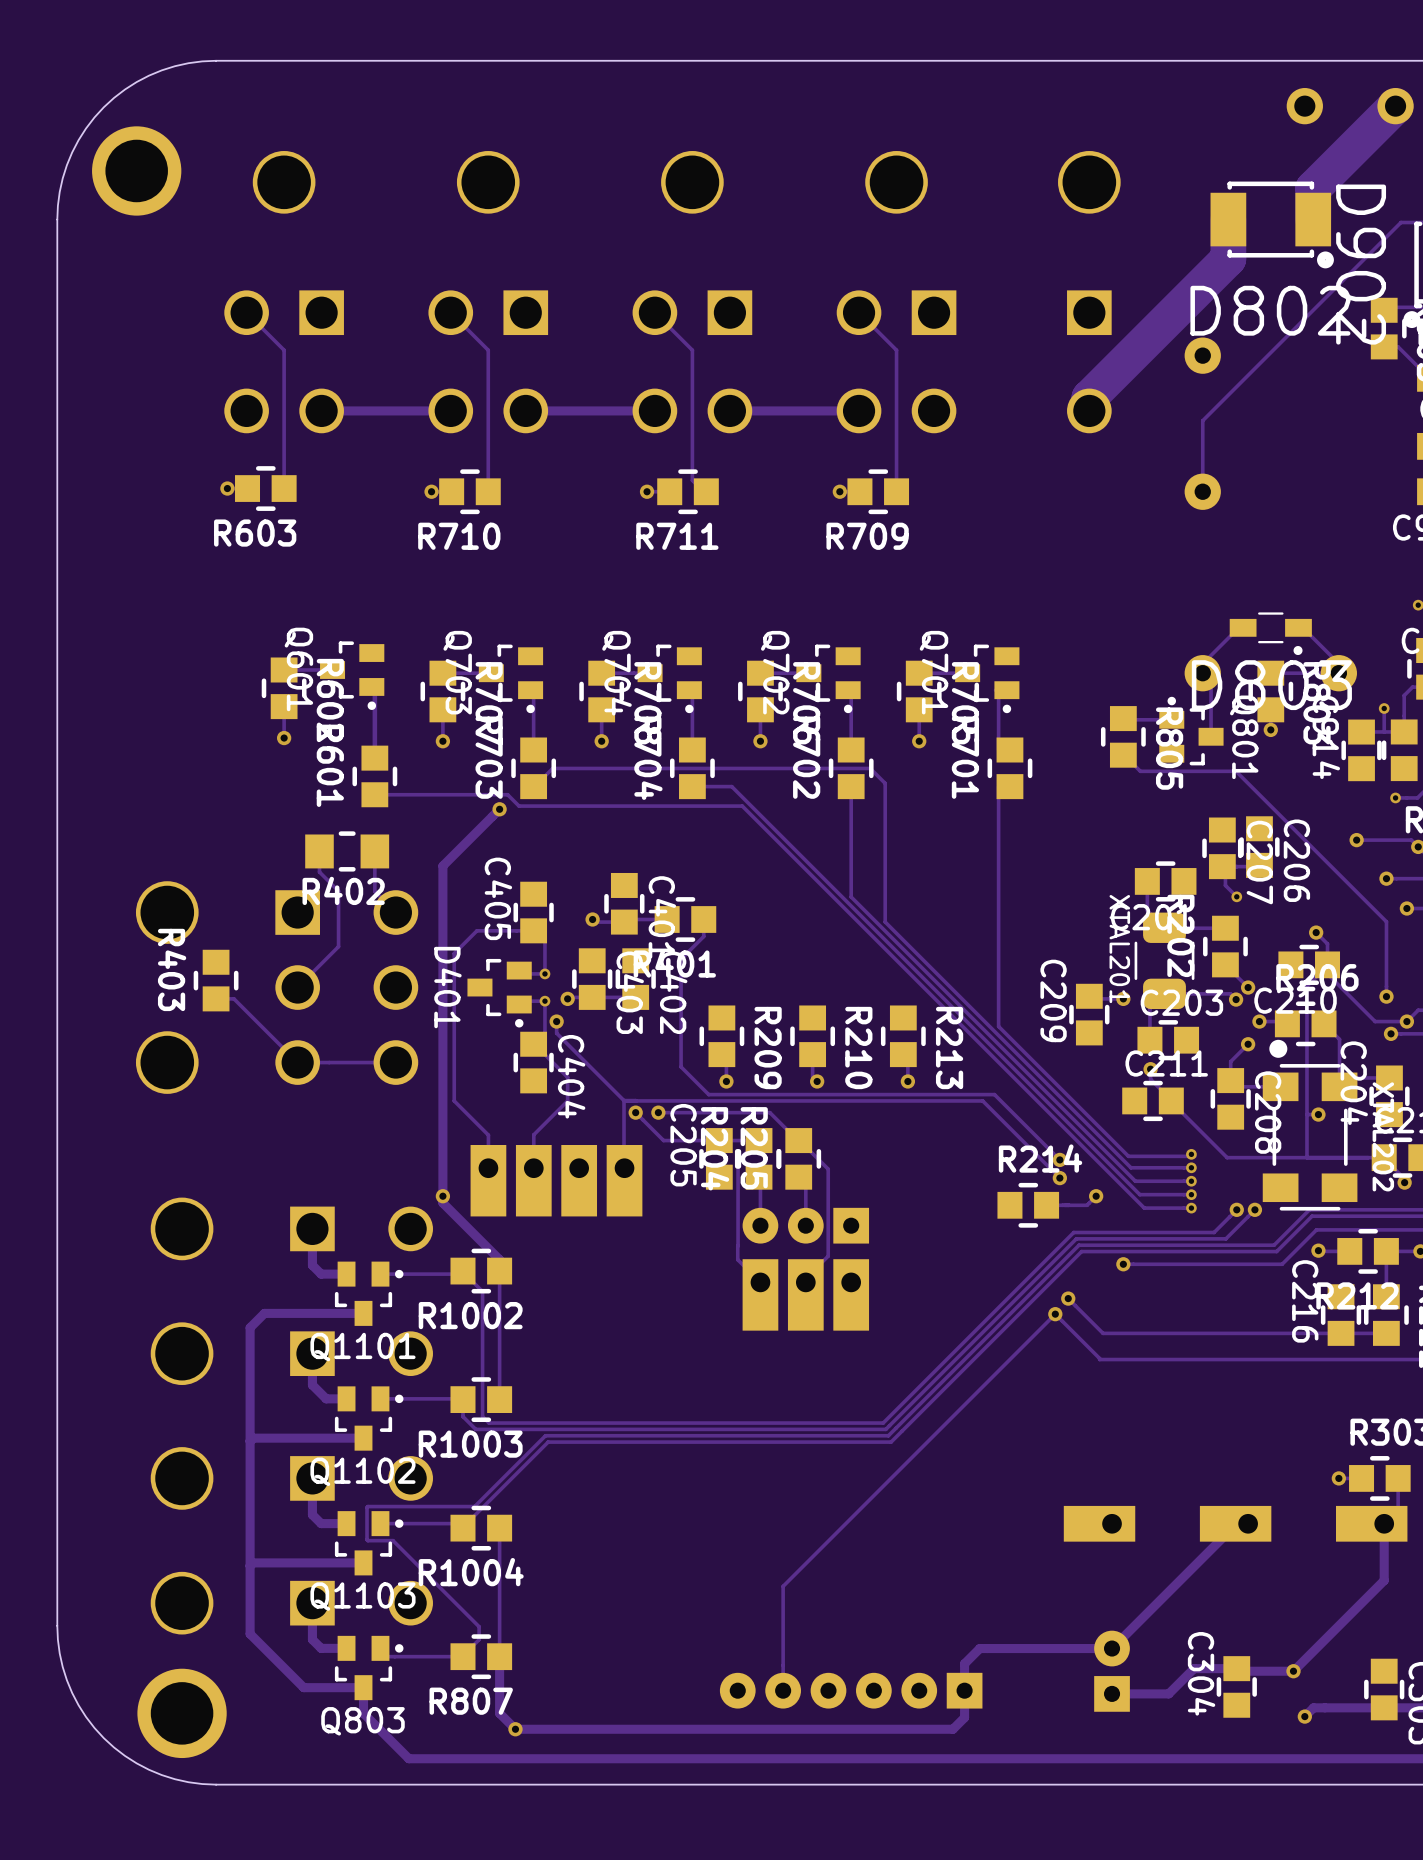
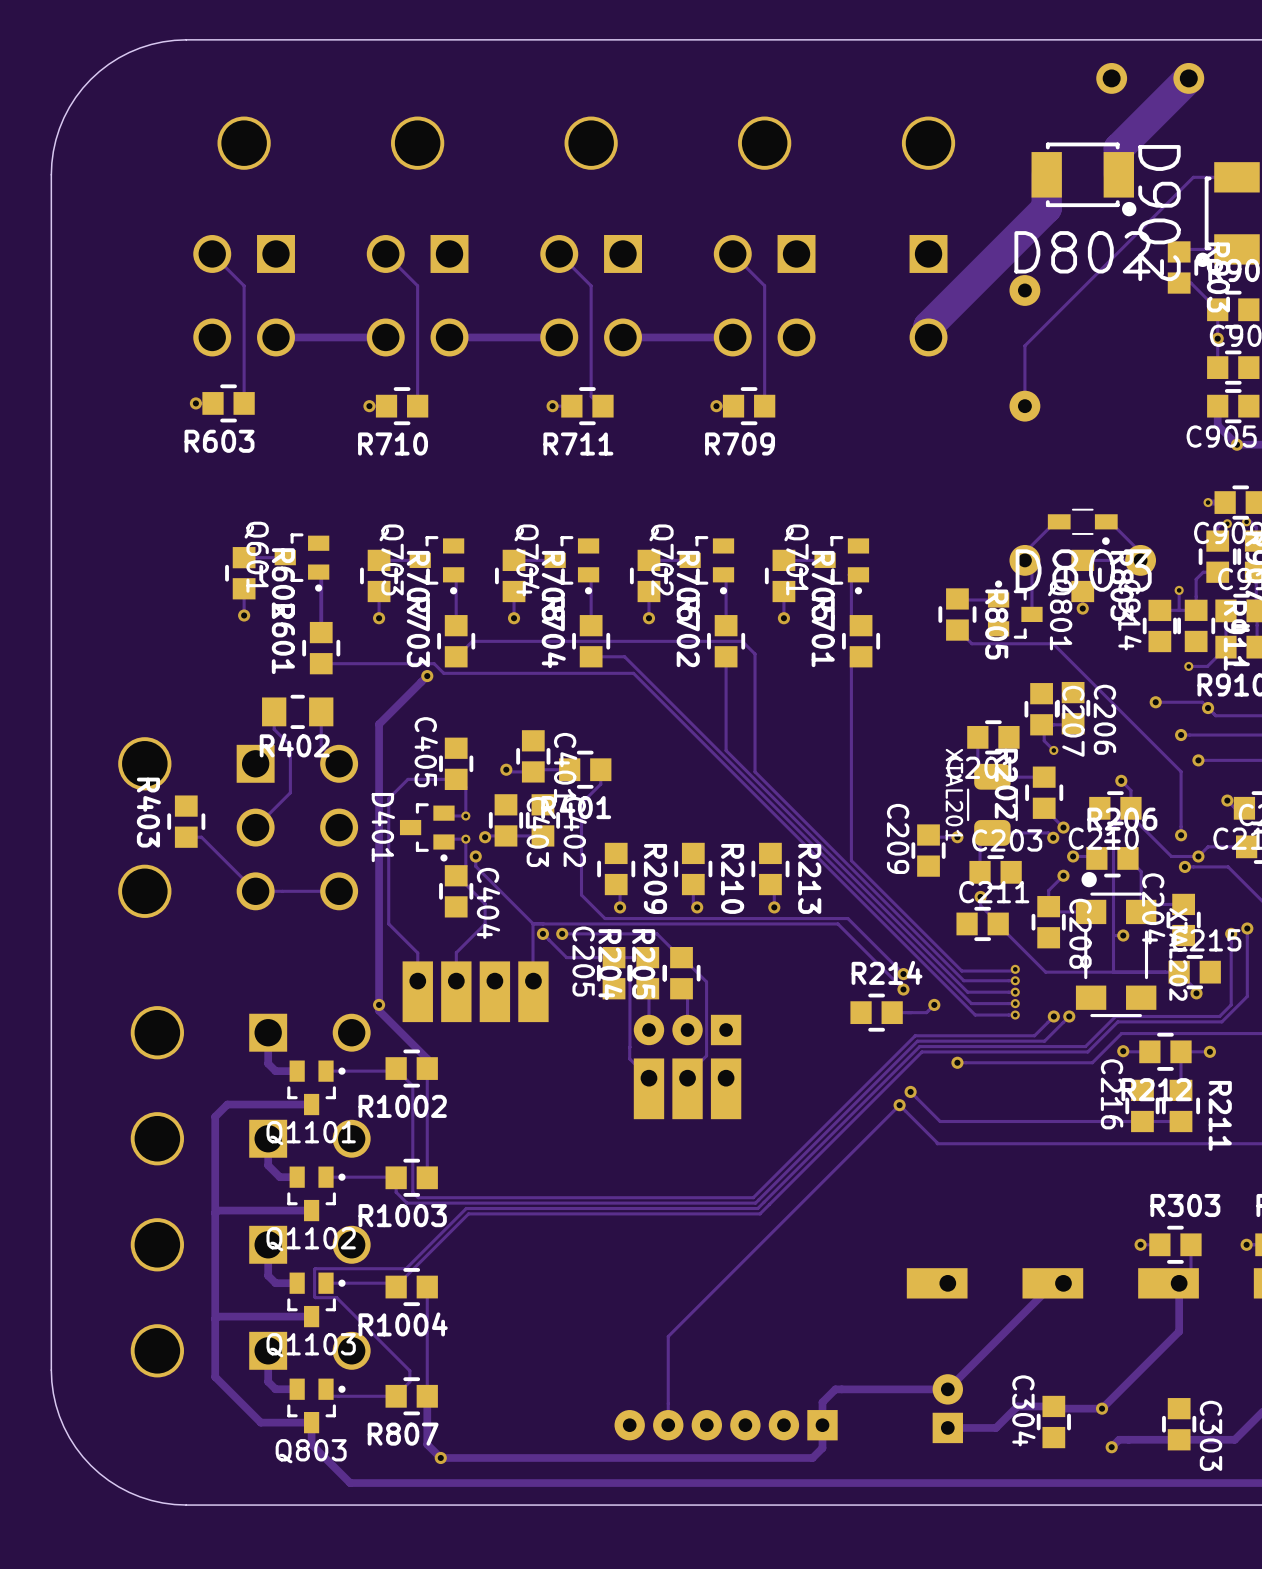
part: (136, 170) -> none
part: (182, 1713) -> none

